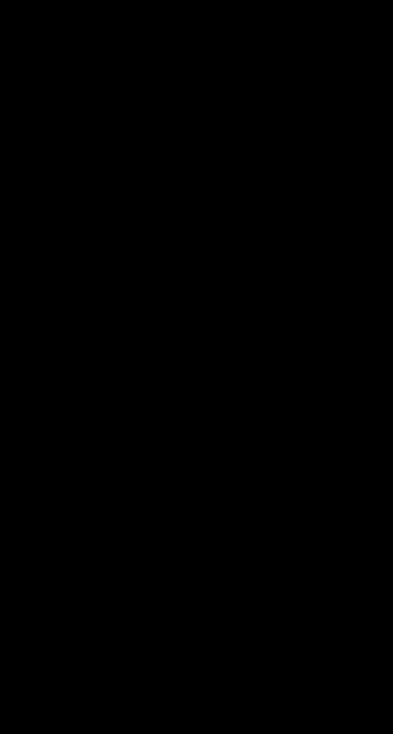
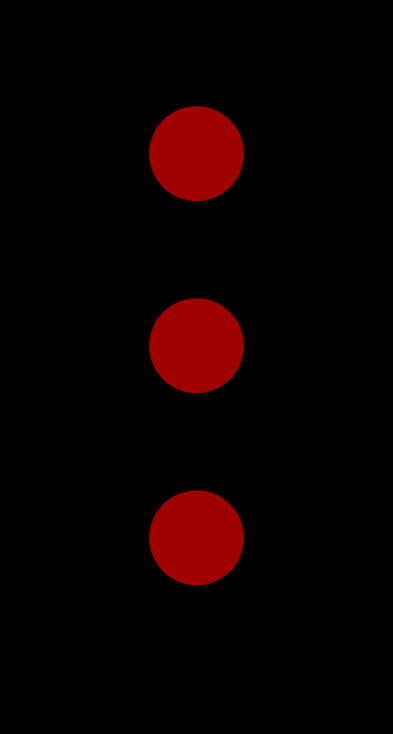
part: none -> (196, 153)
part: none -> (196, 345)
part: none -> (196, 537)

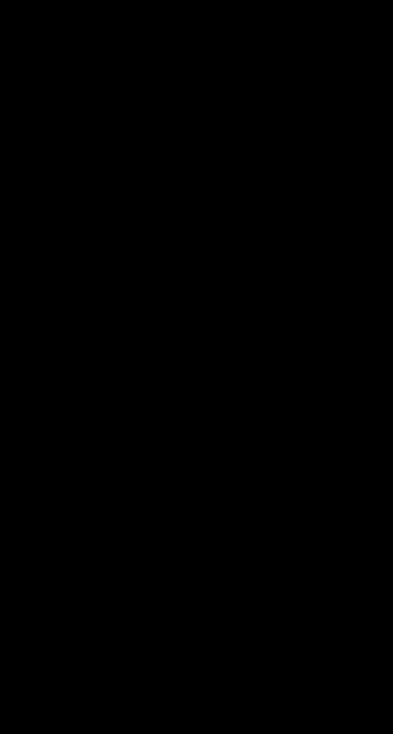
part: (196, 153) -> none
part: (196, 345) -> none
part: (196, 537) -> none

